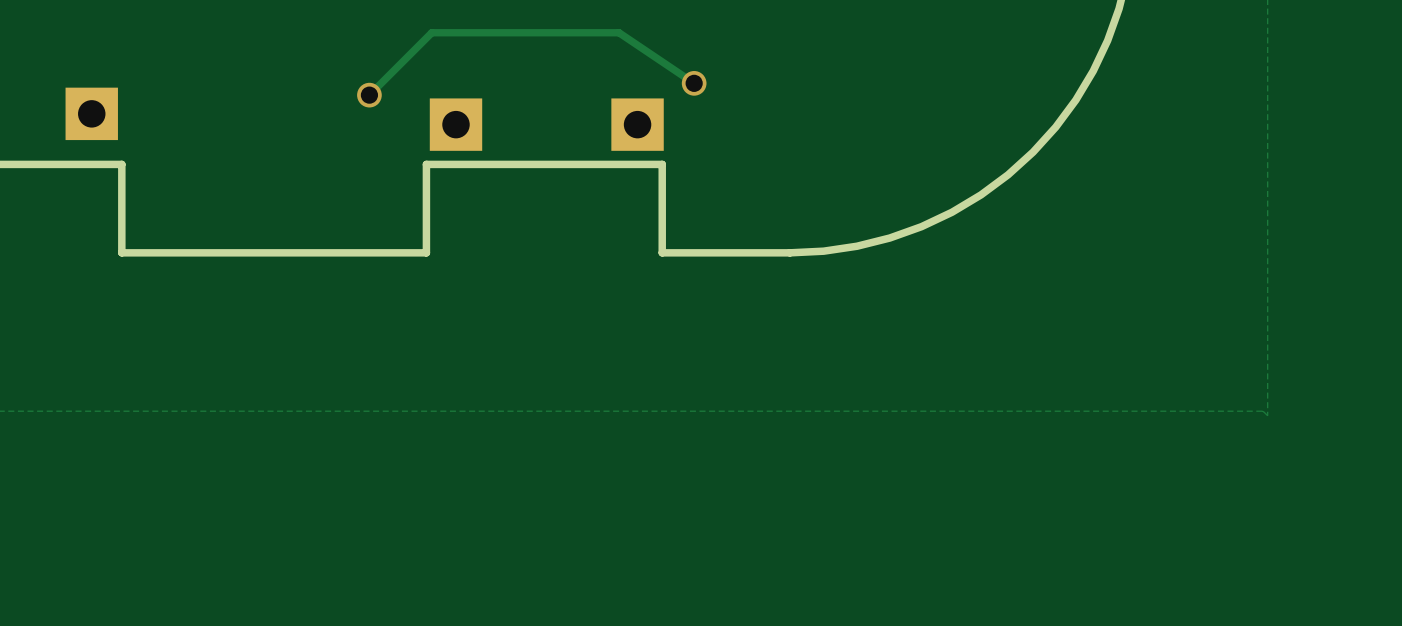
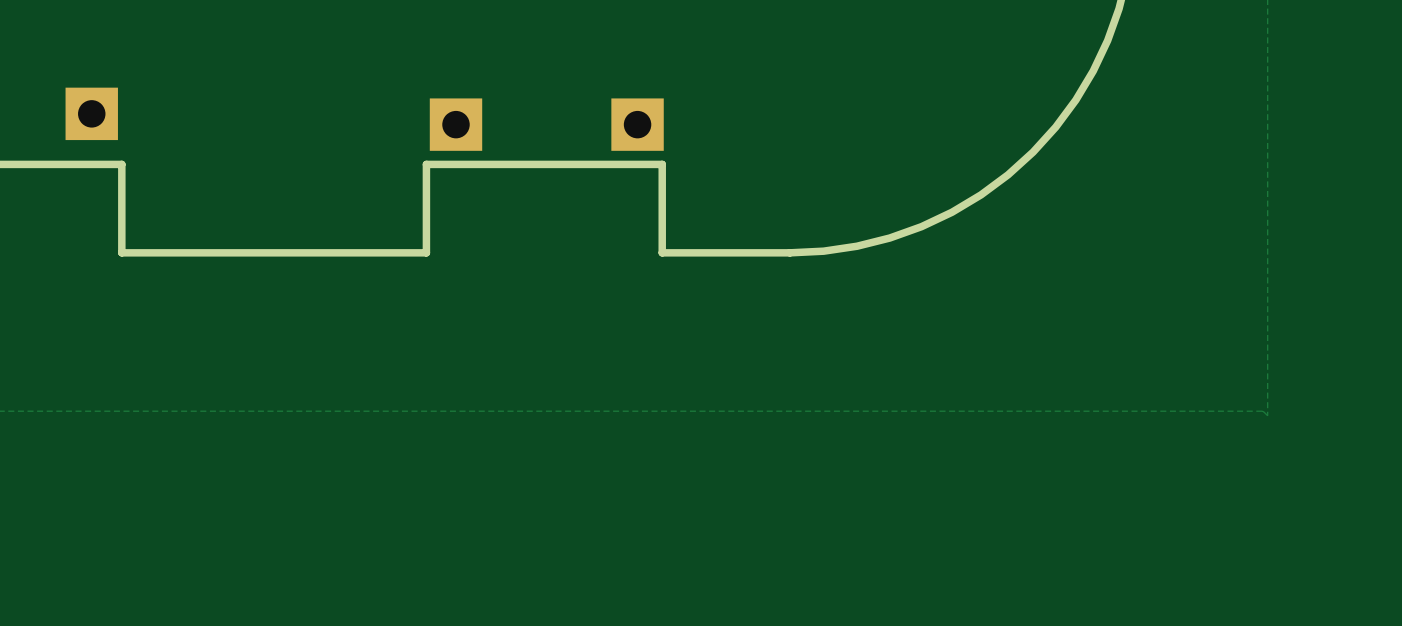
track: (694, 83) (618, 32) (431, 32) (369, 95) -> none
via: (694, 83) -> none
via: (369, 95) -> none

